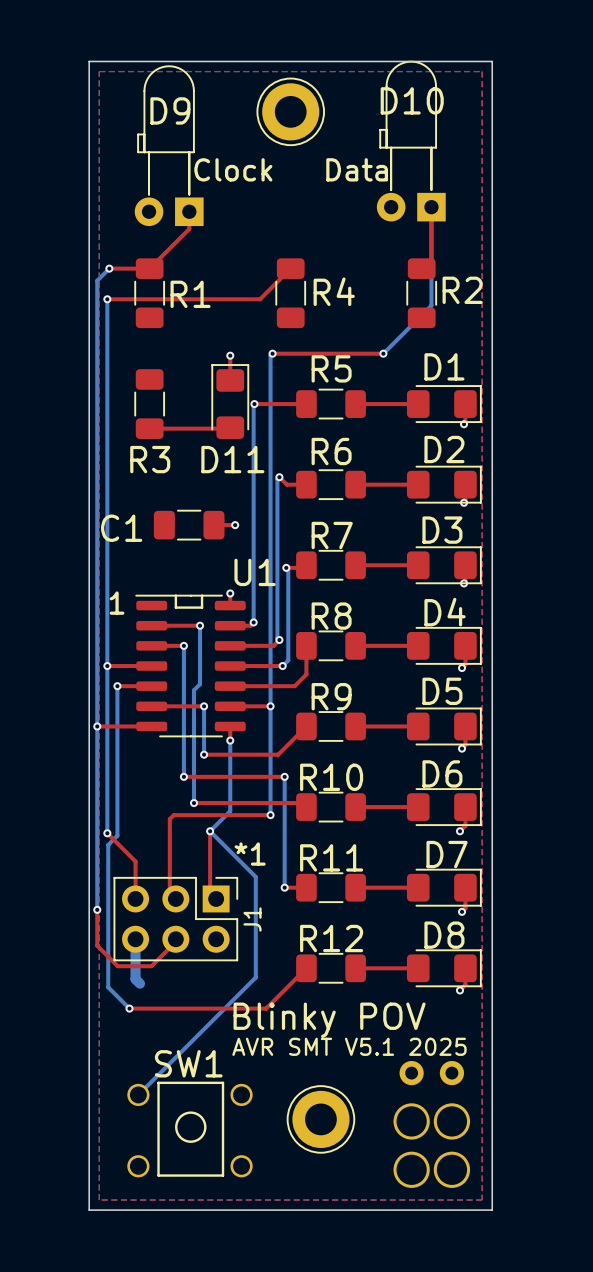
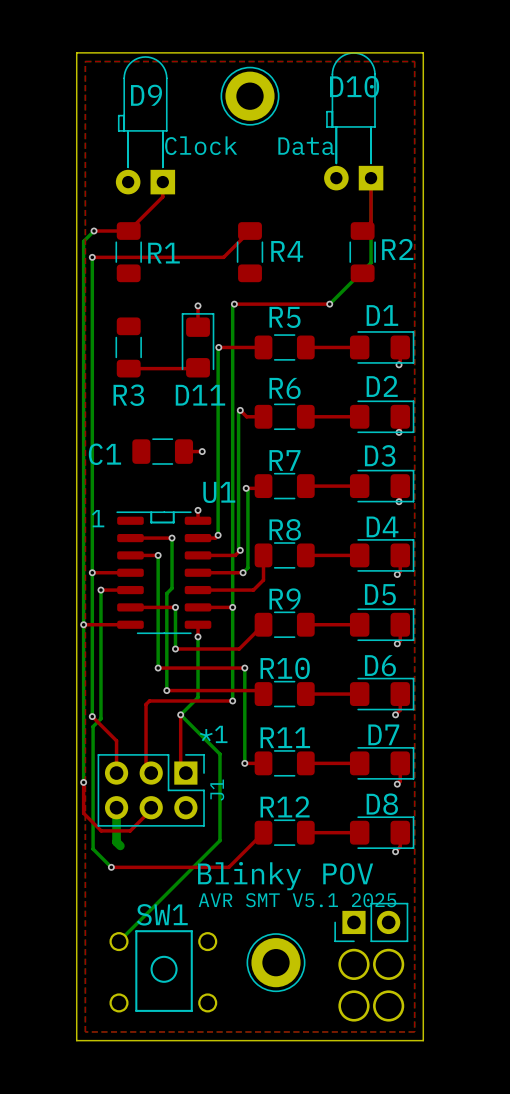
part: none -> (371, 922)

